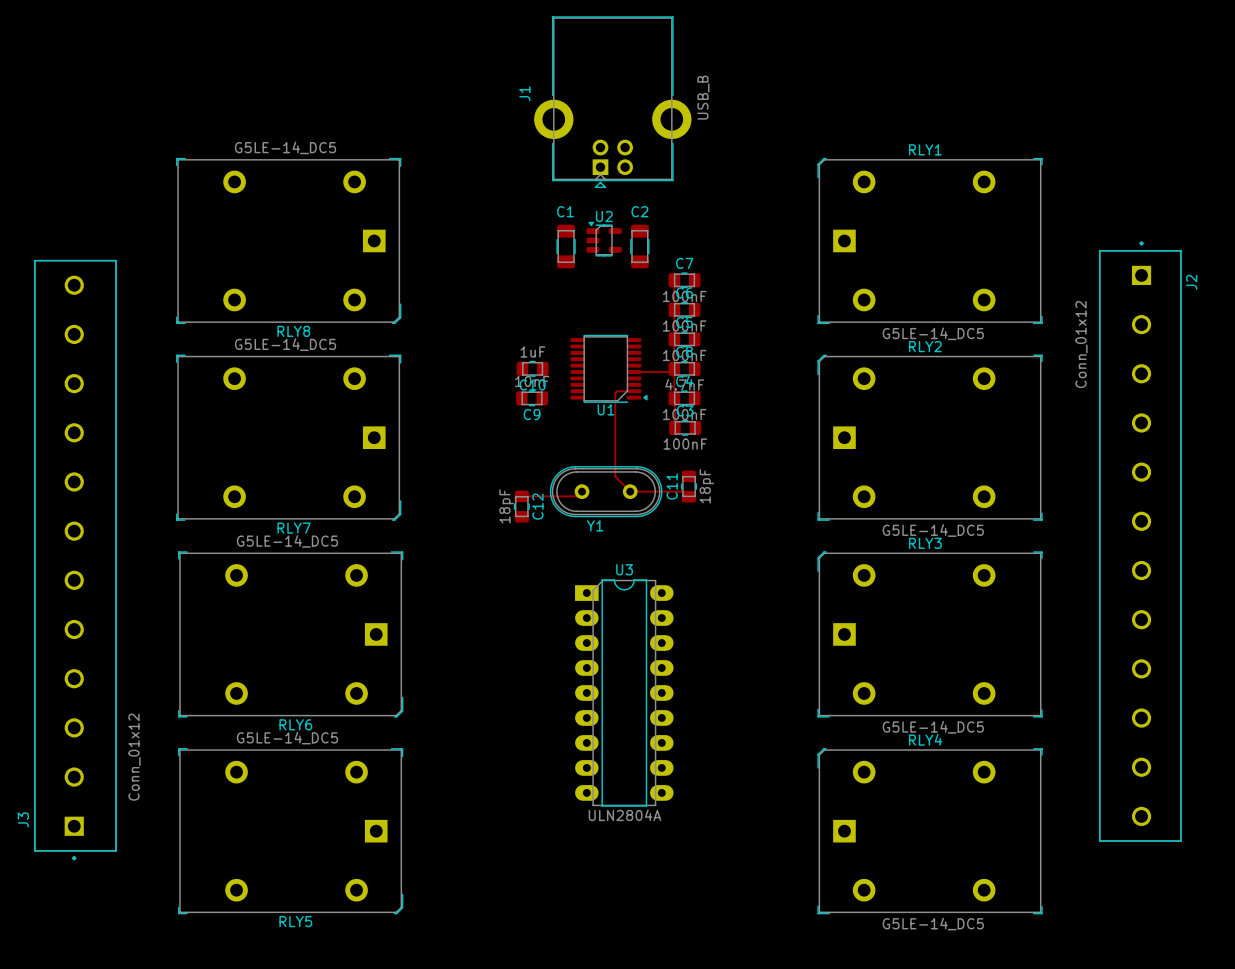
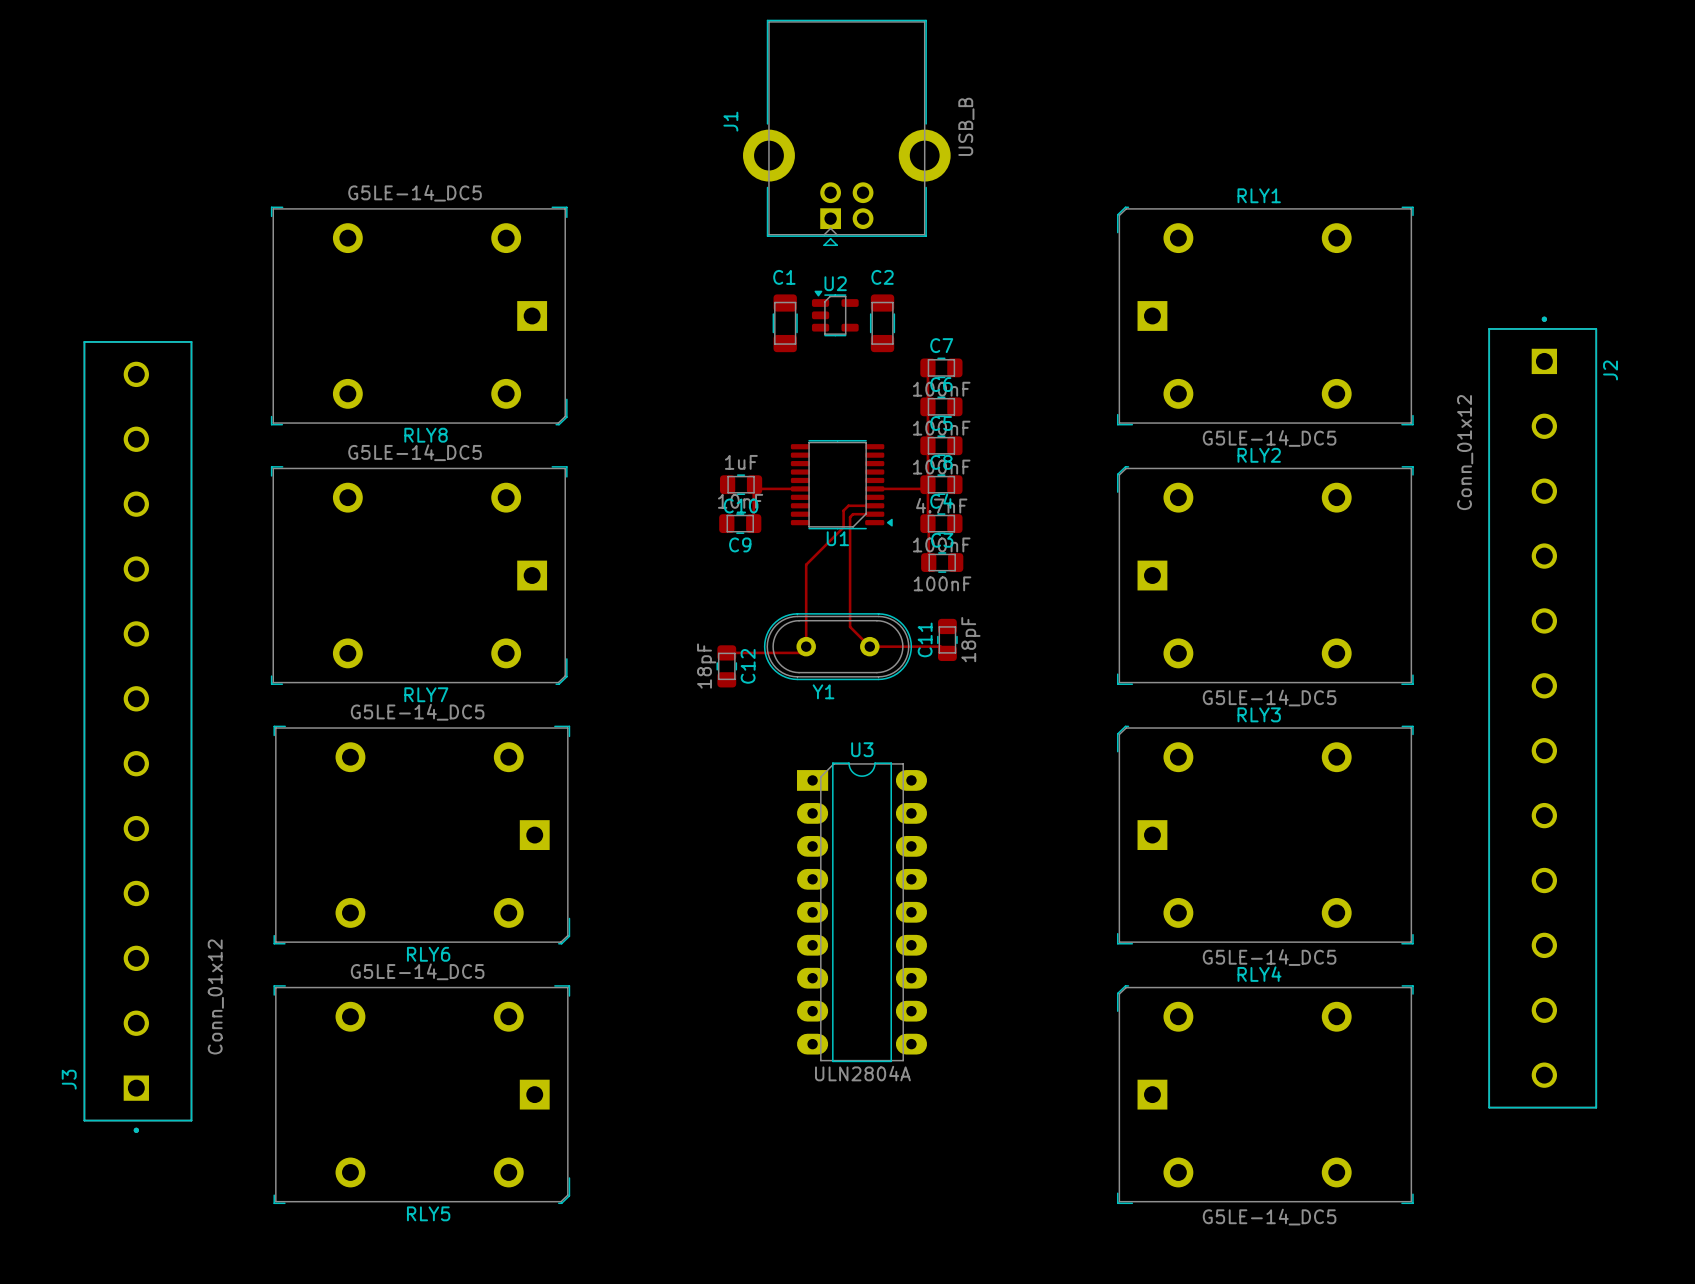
top track: none -> (753, 485) (753, 523)
top track: none -> (758, 488) (800, 488)
top track: none -> (874, 505) (848, 505) (843, 510) (843, 527) (806, 564) (806, 646)

